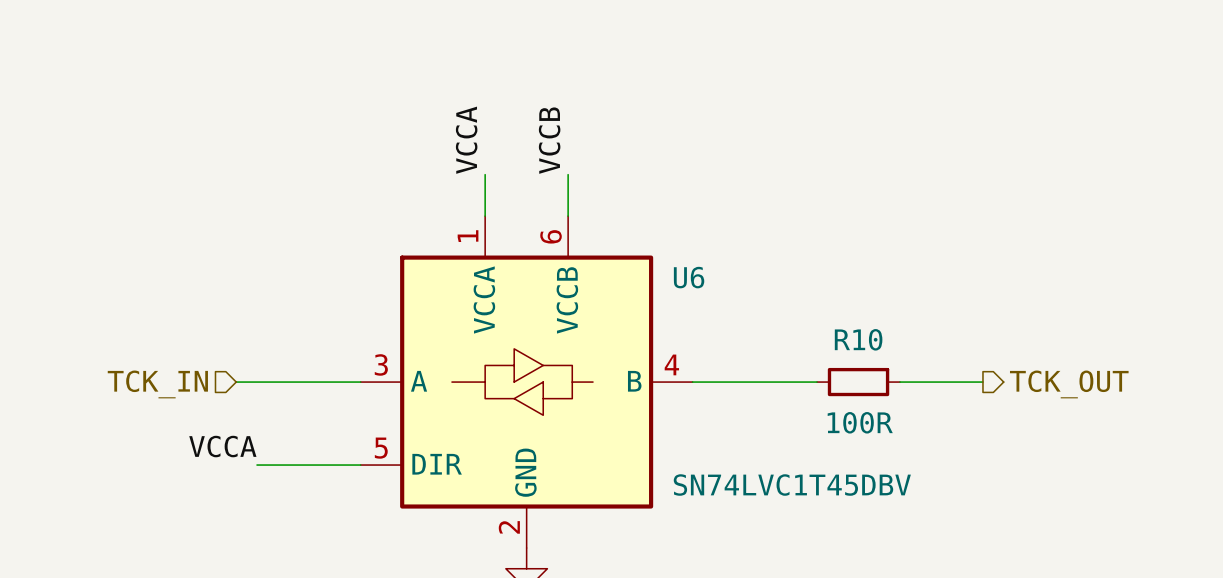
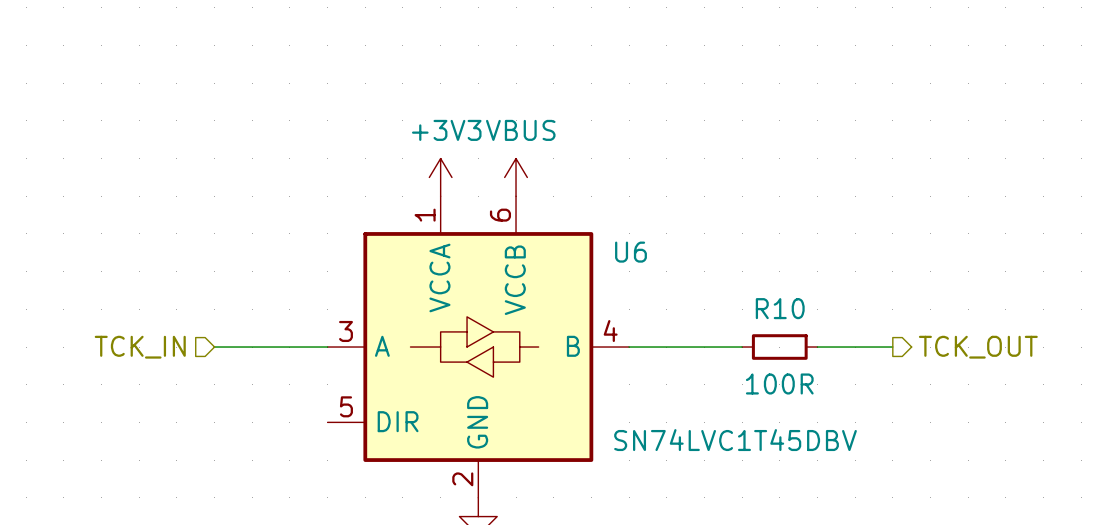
label: VCCA (466, 140) -> none
label: VCCB (549, 140) -> none
power symbol: none -> +3V3 (440, 177)
power symbol: none -> VBUS (516, 177)
label: VCCA (222, 446) -> none
wire: (256, 465) (360, 465) -> none

